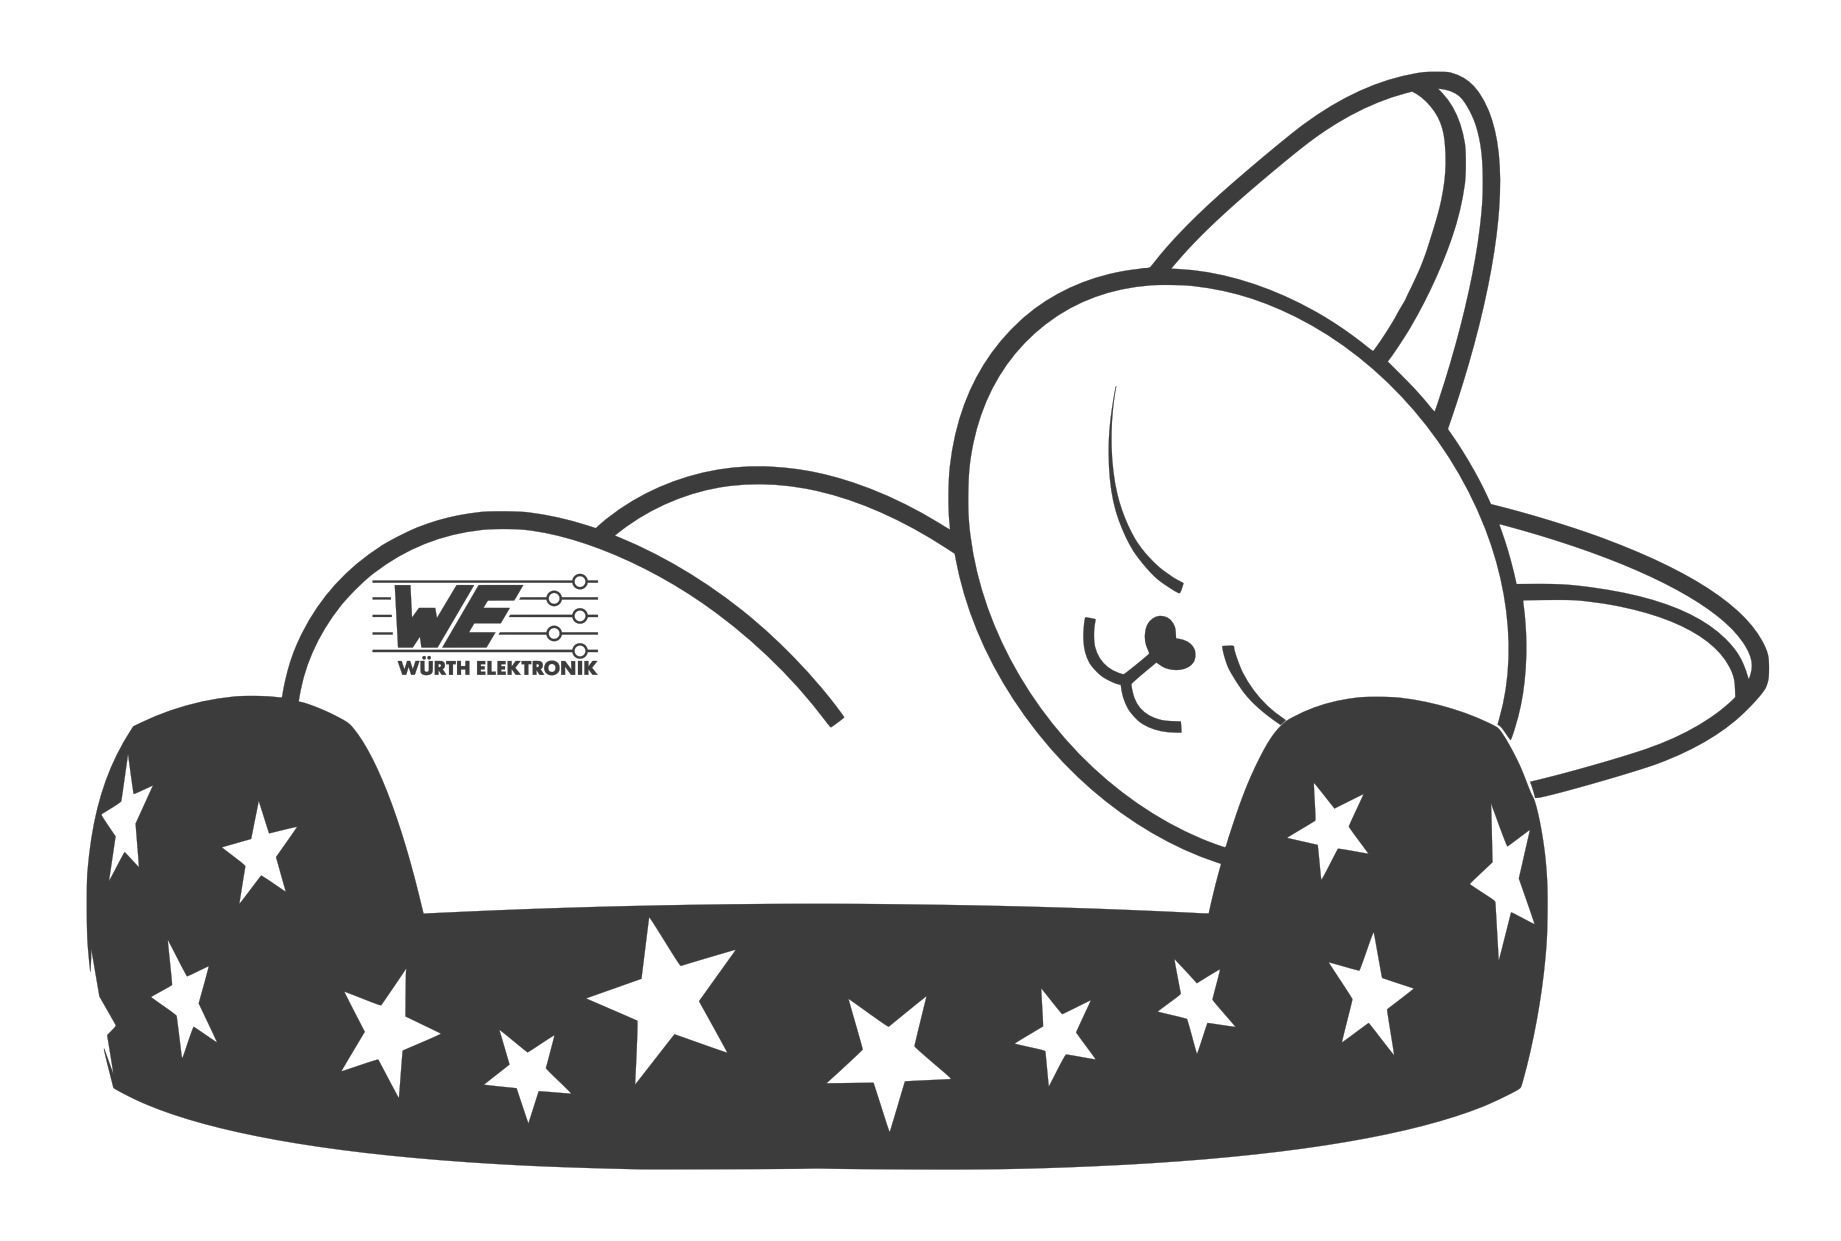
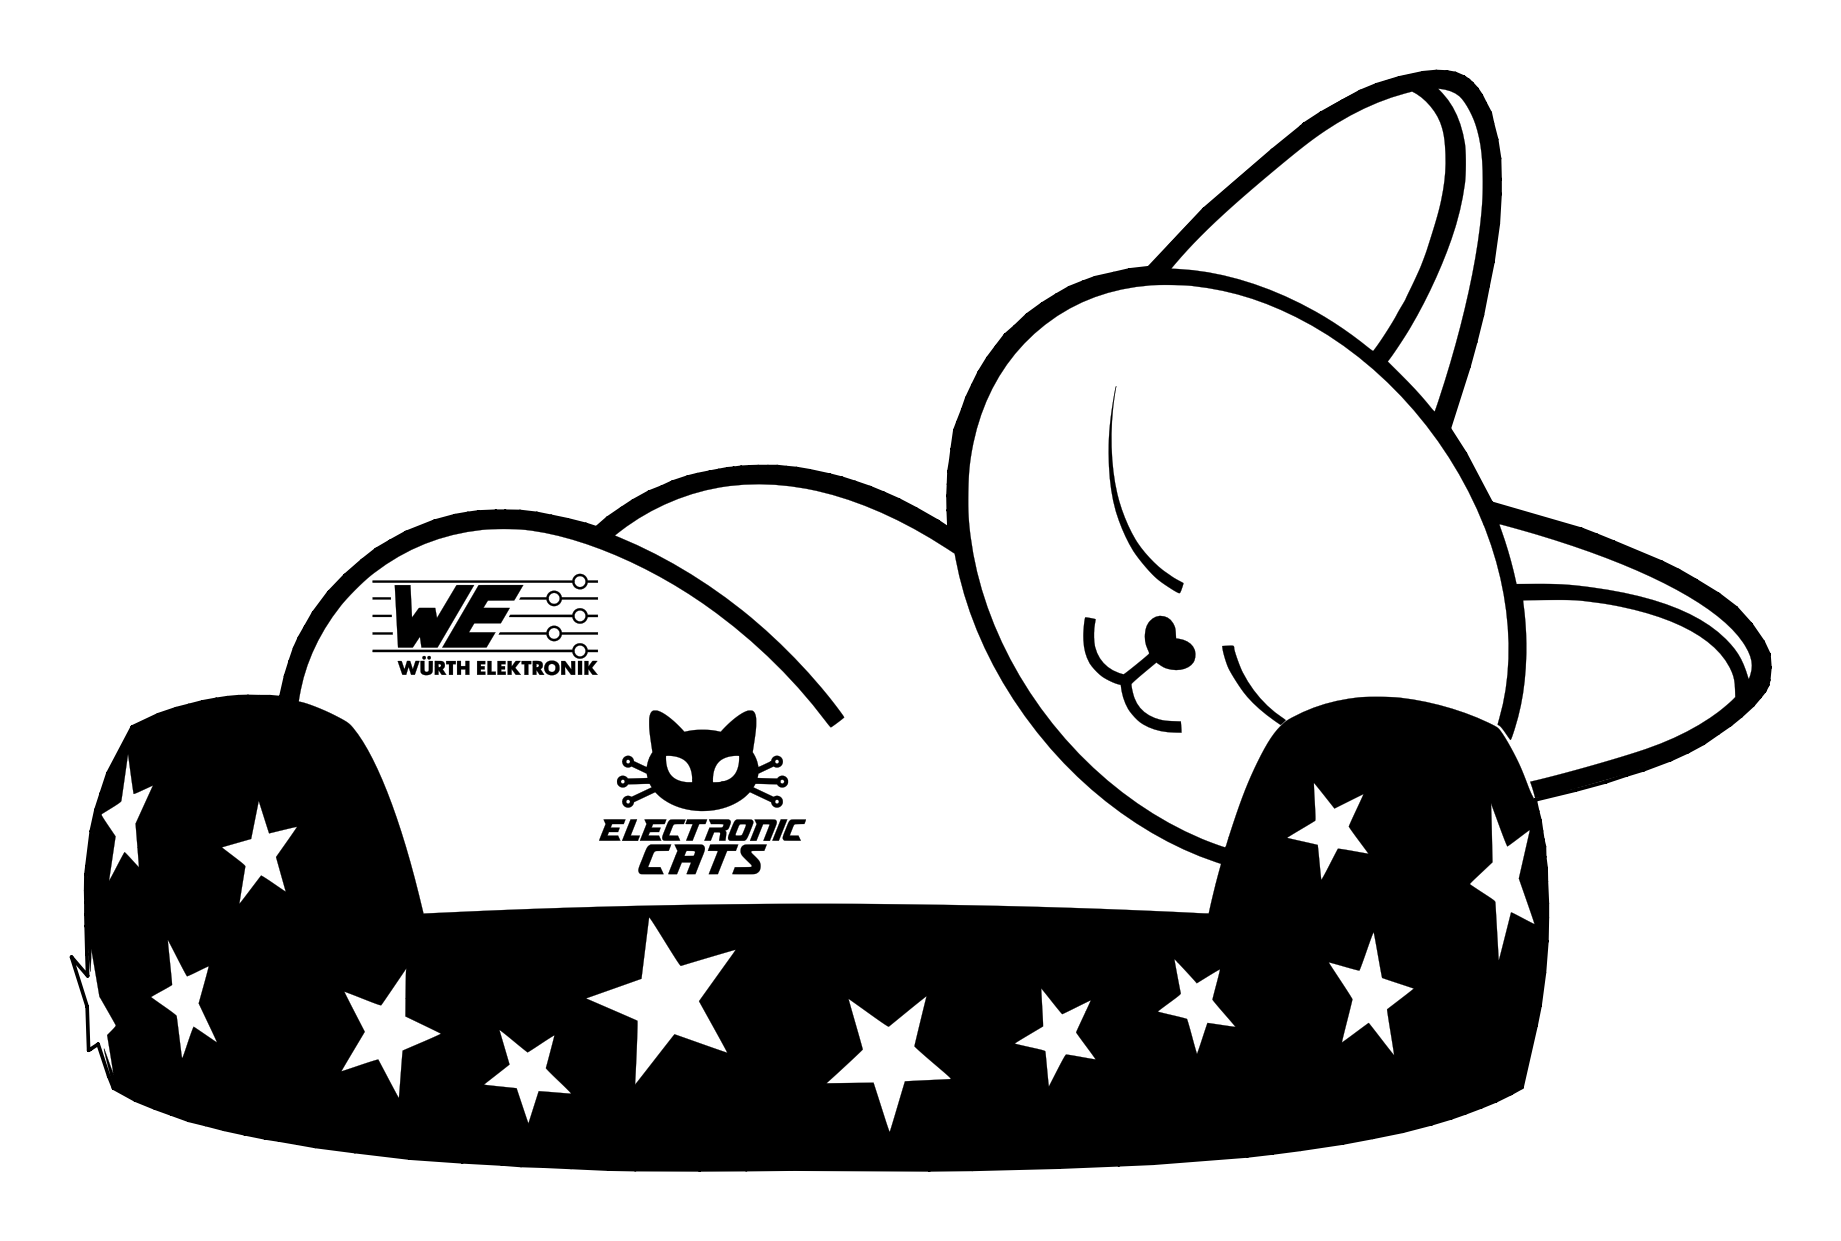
board edge: none -> (1436, 71) (1455, 73) (1468, 80) (1476, 88) (1490, 113) (1499, 158) (1498, 223) (1492, 261) (1475, 342) (1449, 428) (1465, 453) (1491, 503) (1581, 529) (1678, 570) (1718, 594) (1736, 607) (1751, 624) (1768, 654) (1768, 680) (1764, 691) (1741, 715) (1703, 743) (1670, 759) (1643, 769) (1605, 781) (1535, 799) (1544, 846) (1546, 941) (1540, 1005) (1521, 1087) (1481, 1106) (1431, 1123) (1372, 1137) (1300, 1149) (1247, 1155) (1153, 1163) (929, 1169) (608, 1169) (409, 1158) (315, 1146) (224, 1129) (188, 1120) (154, 1108) (113, 1088) (98, 1044) (88, 1050) (87, 1006) (71, 957) (87, 975) (85, 874) (91, 831) (107, 773) (132, 726) (158, 714) (202, 701) (238, 696) (280, 697) (290, 661) (299, 637) (313, 612) (345, 575) (376, 549) (406, 532) (455, 515) (478, 511) (520, 511) (567, 519) (596, 527) (633, 501) (672, 482) (727, 468) (777, 466) (829, 475) (869, 487) (898, 500) (949, 528) (949, 471) (954, 430) (979, 372) (1005, 335) (1027, 314) (1069, 287) (1095, 277) (1148, 267) (1203, 209) (1304, 124) (1320, 113) (1376, 84) (1399, 77) (1436, 71)
drawing: none -> [599, 710, 806, 875]

